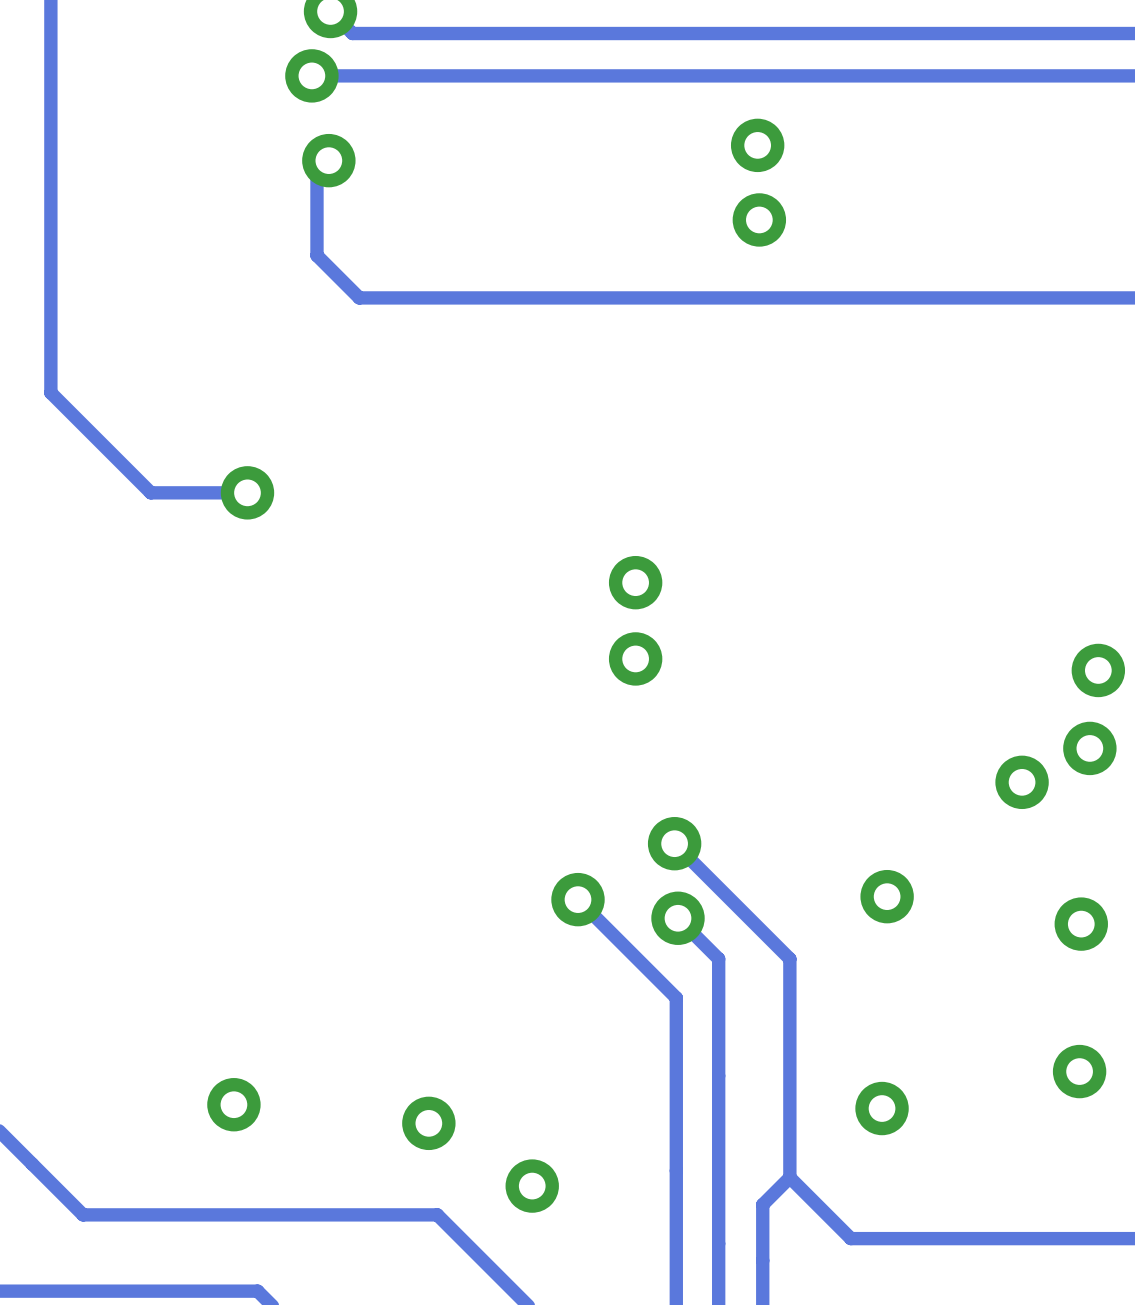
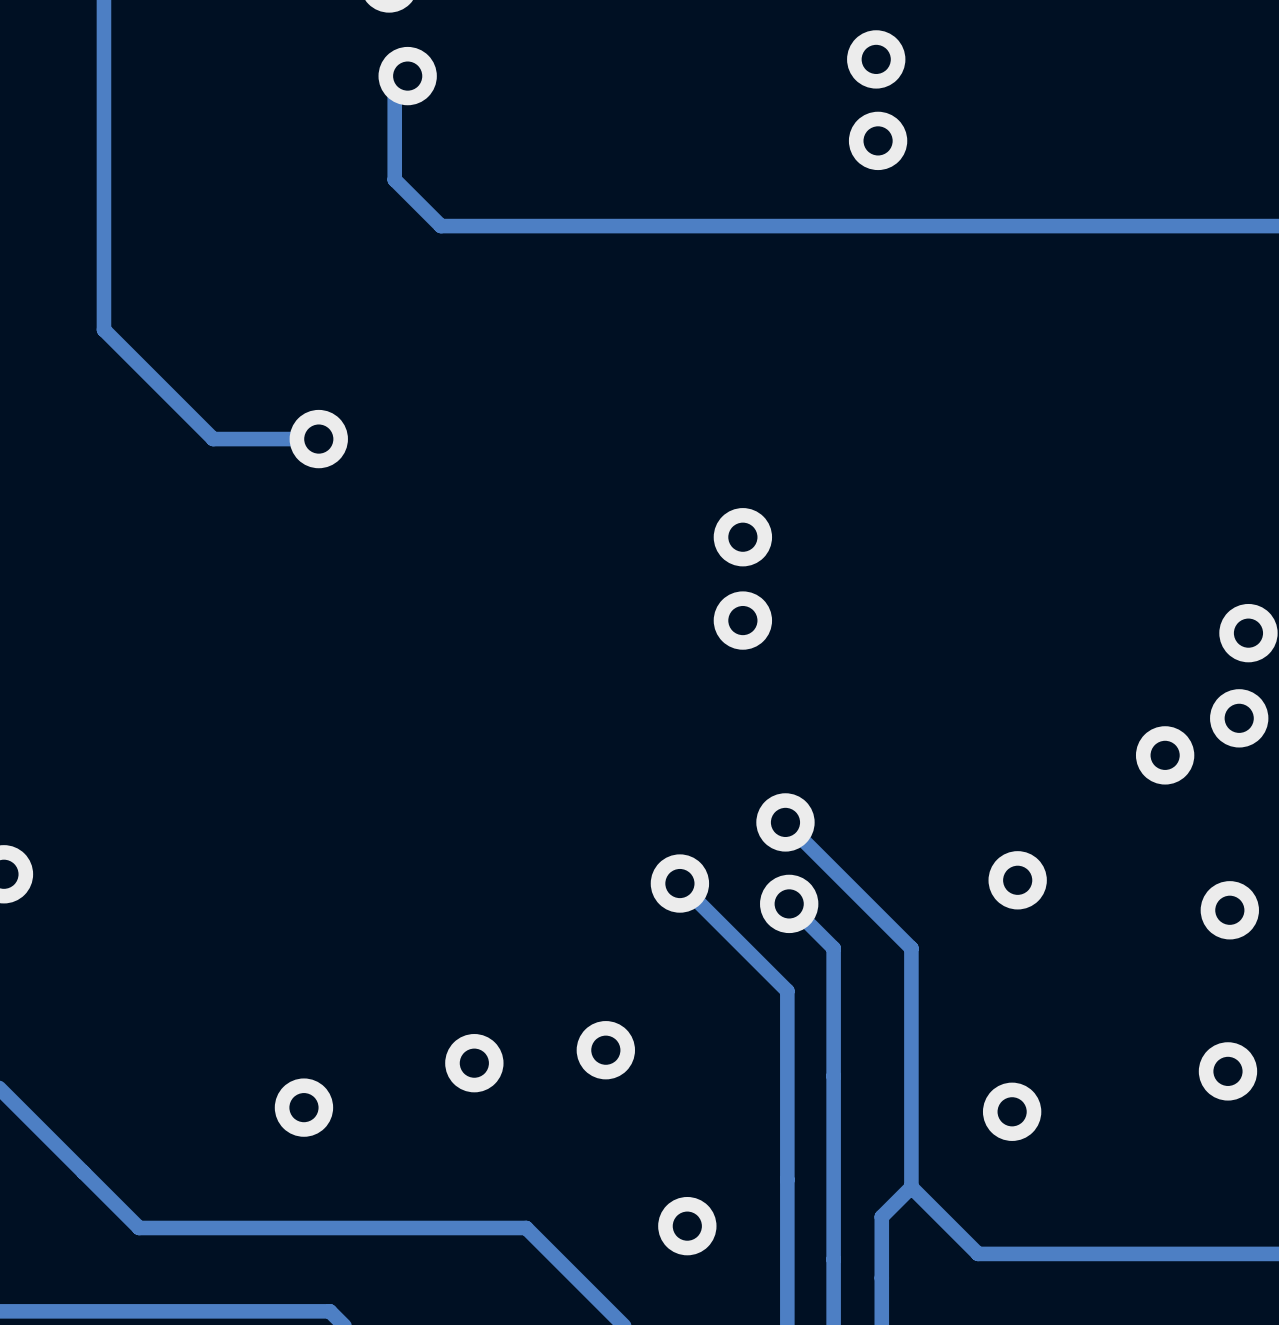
via: none -> (605, 1050)
via: none -> (474, 1063)
via: (428, 1123) -> none
via position: (532, 1186) -> (687, 1226)

